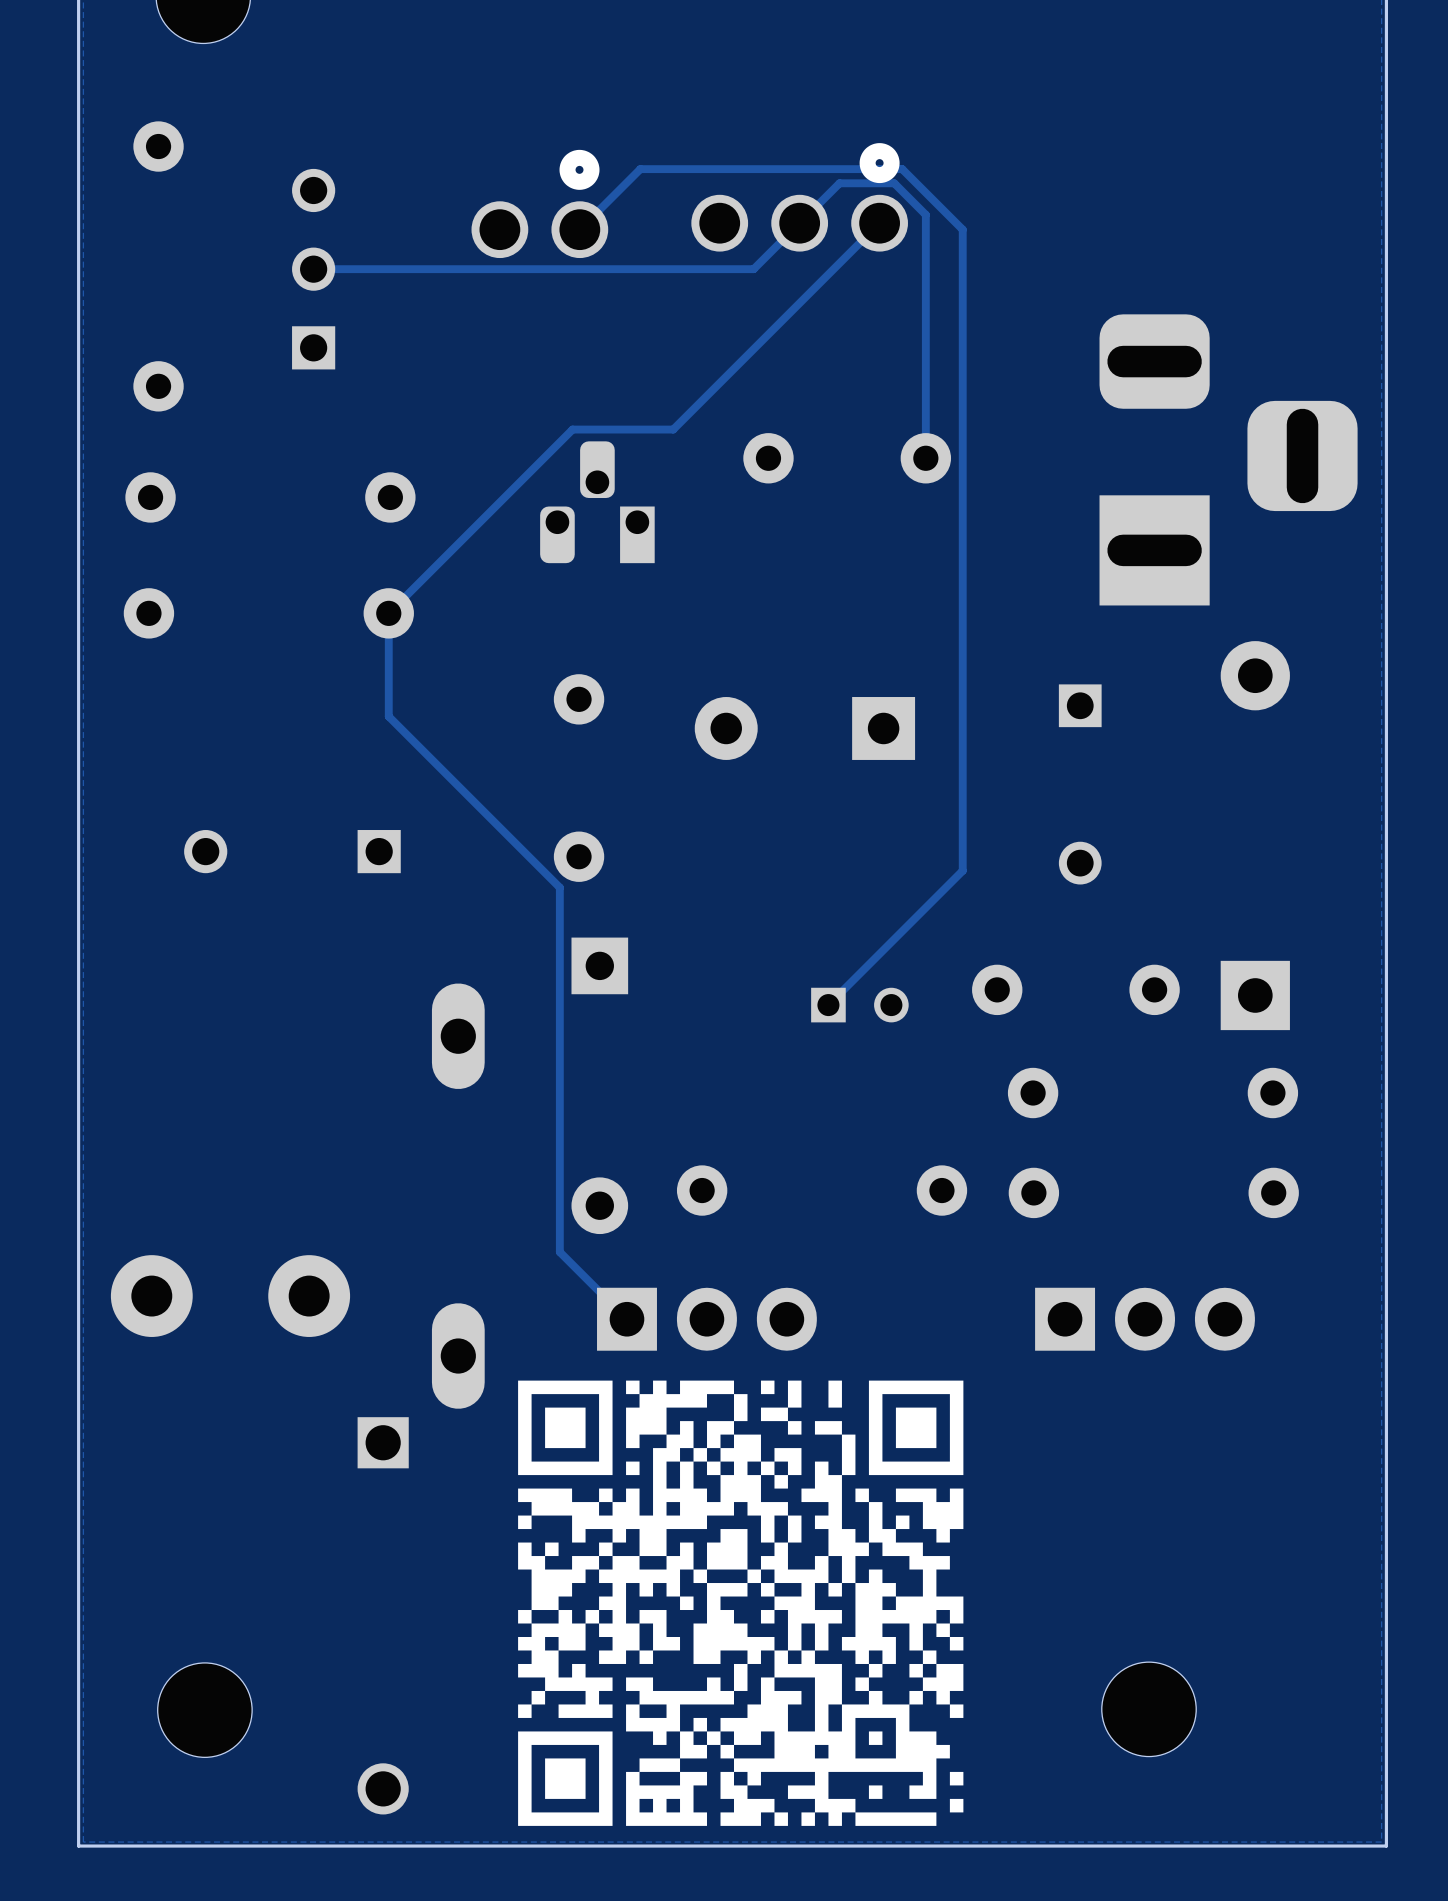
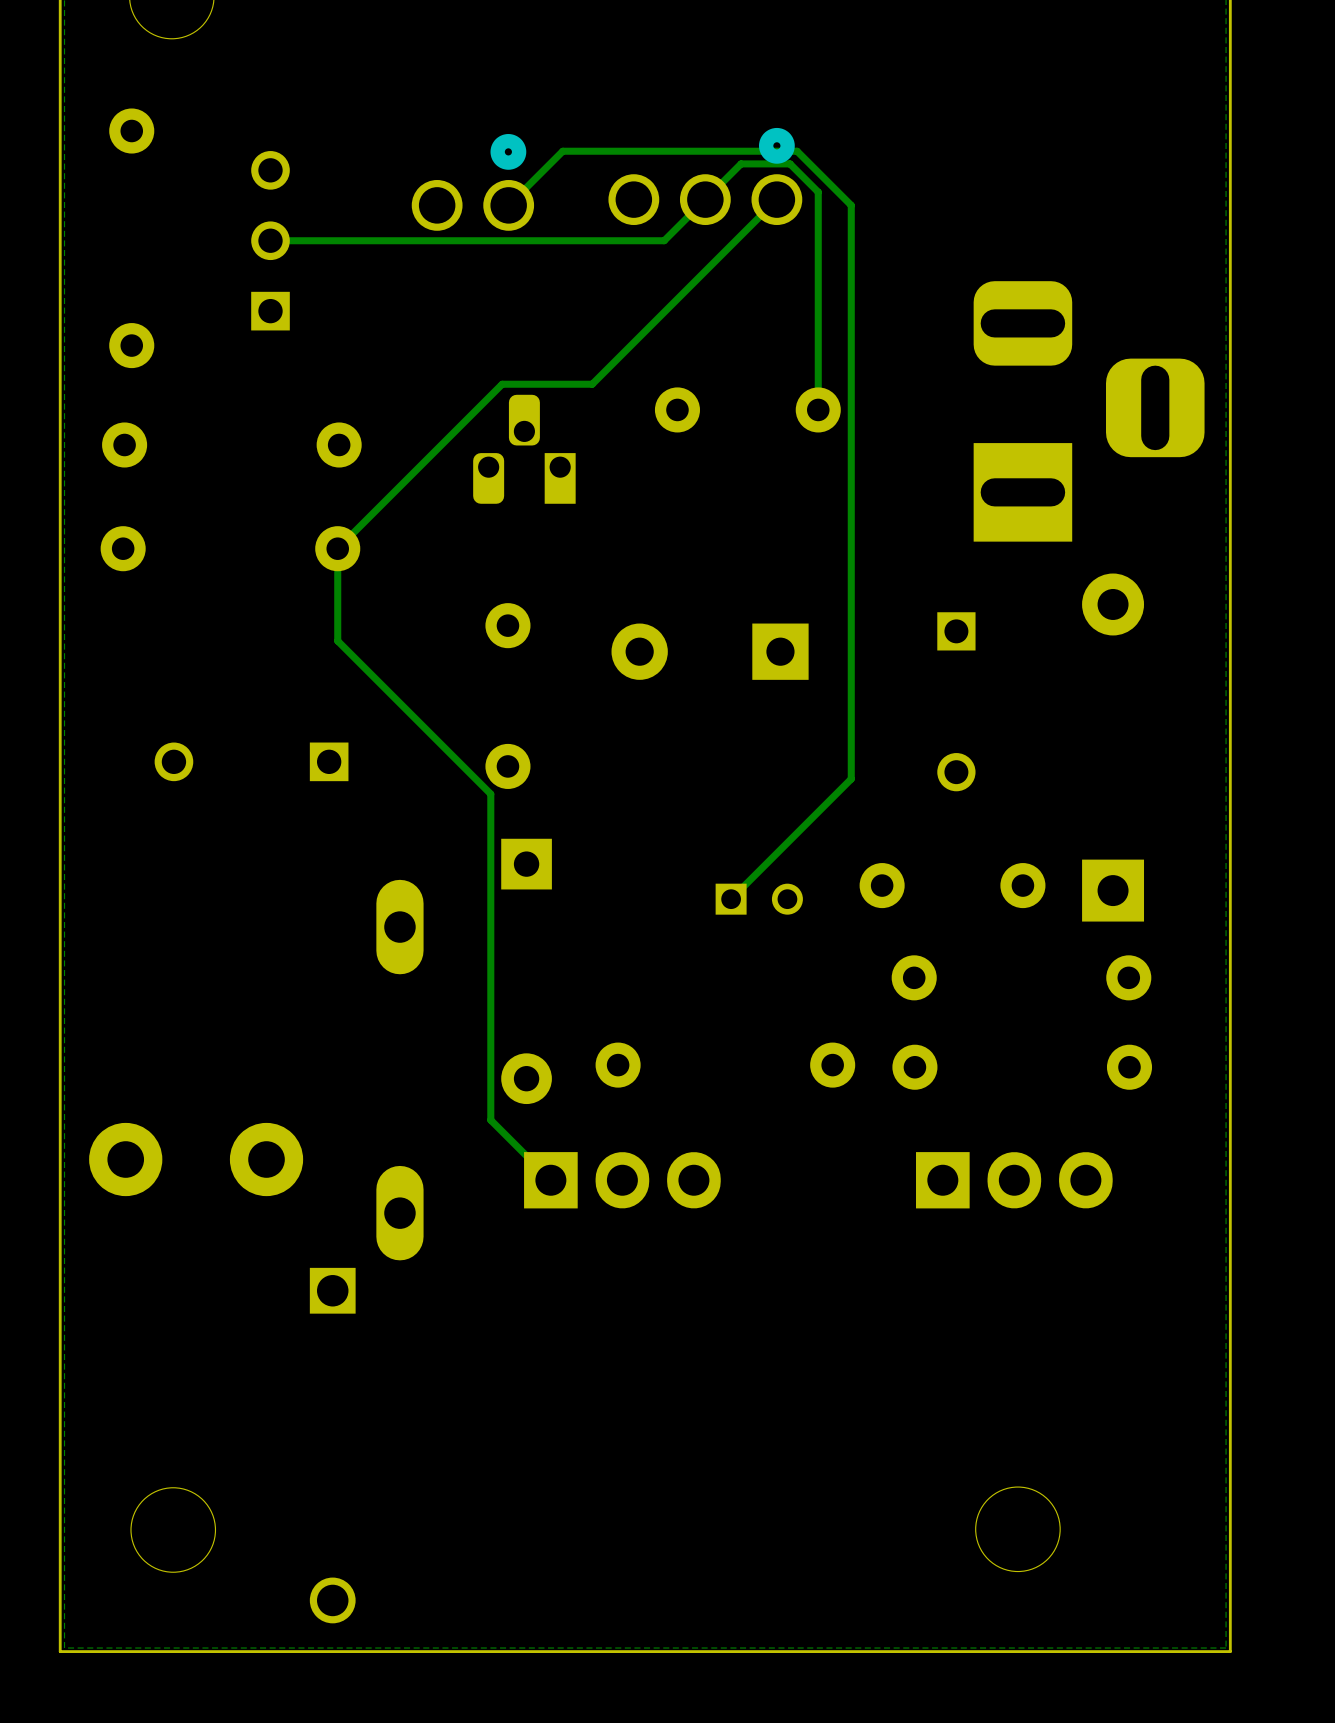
drawing: [518, 1380, 964, 1826] -> none

